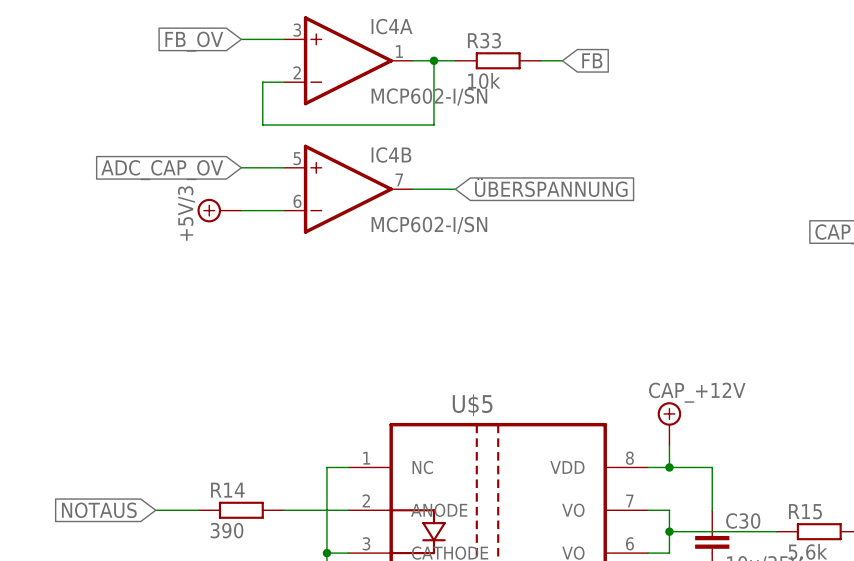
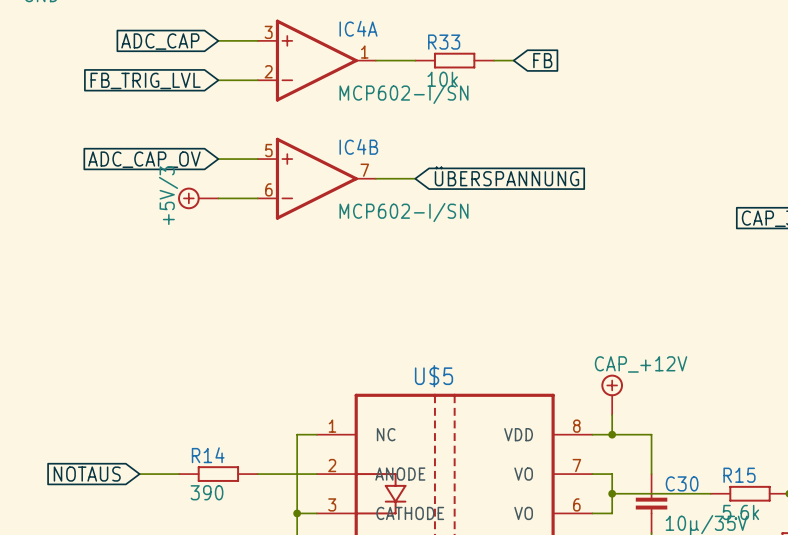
global label: FB_OV (194, 41) -> ADC_CAP (160, 41)
wire: (434, 60) (434, 125) (262, 125) (262, 82) -> (218, 80) (238, 80)
junction: (434, 60) -> none
global label: none -> FB_TRIG_LVL (145, 80)

